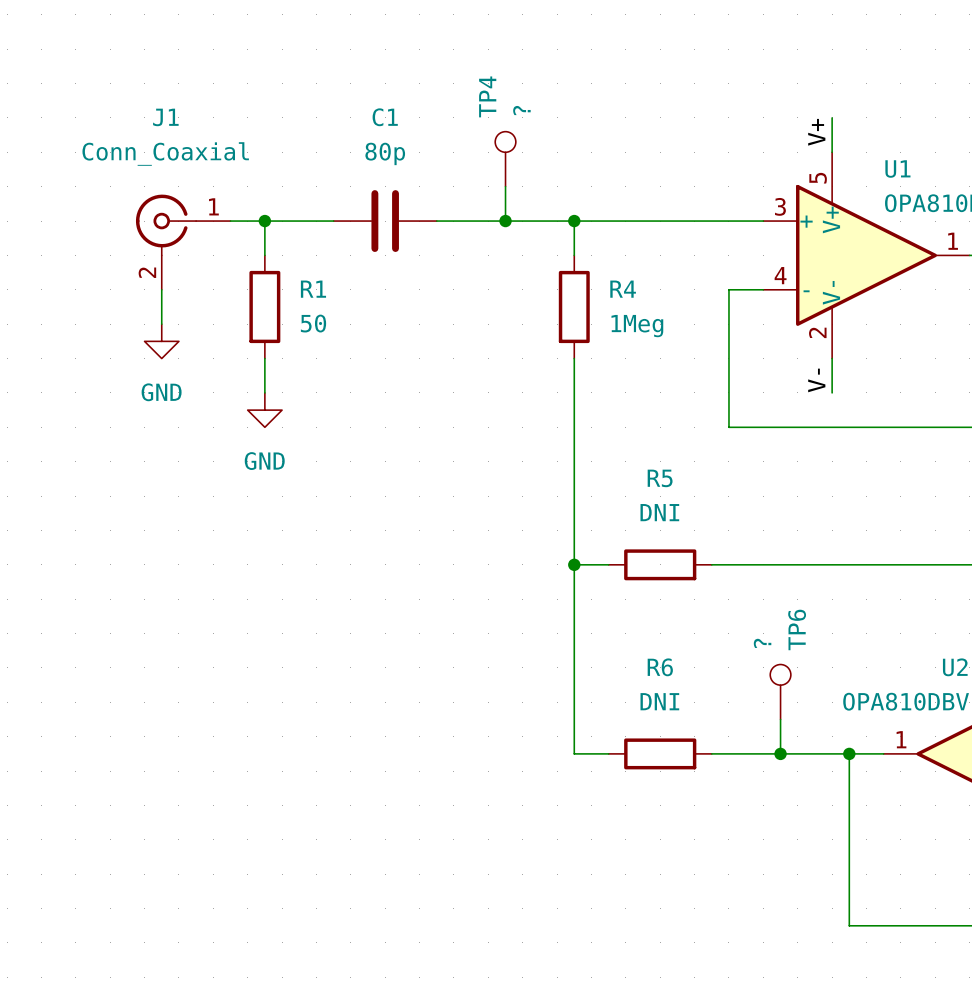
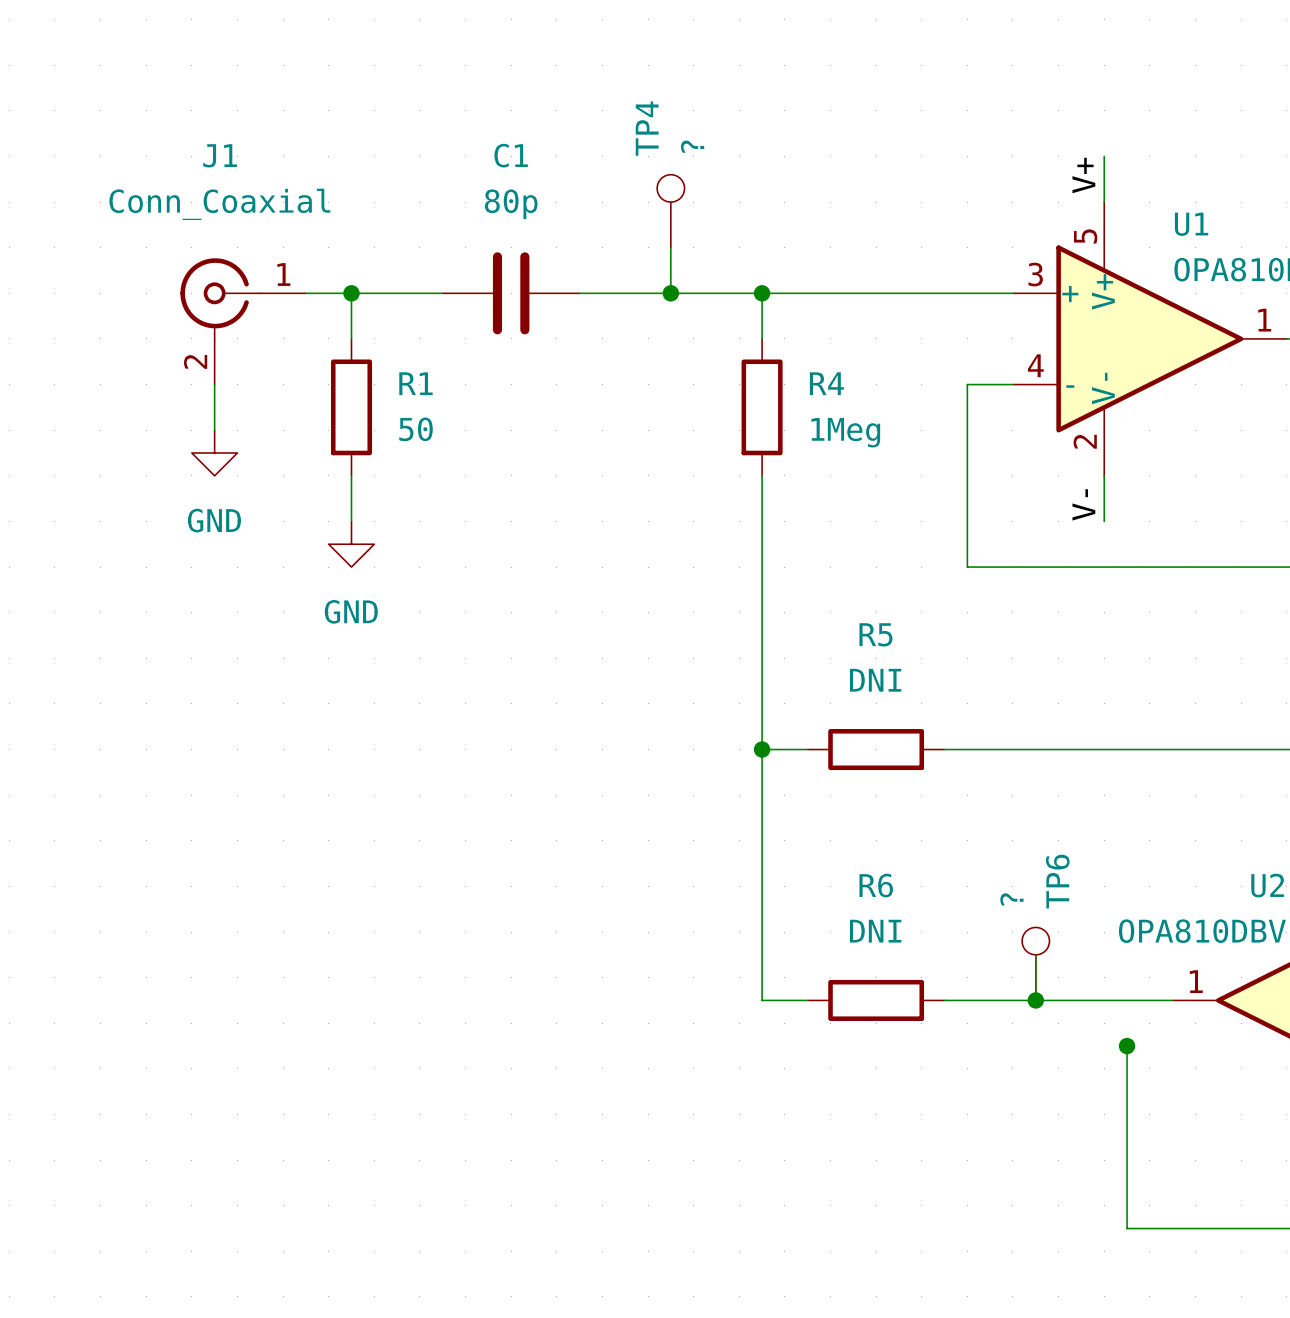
TP6 position: (780, 692) -> (1035, 963)
wire: (849, 753) (849, 788) -> none
junction position: (849, 753) -> (1127, 1046)

